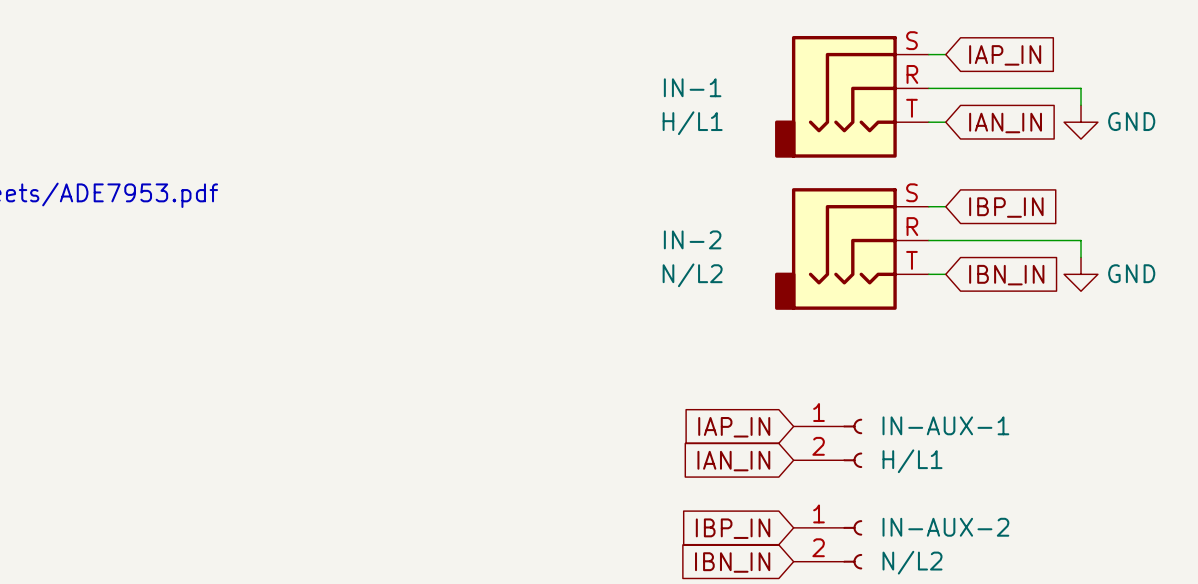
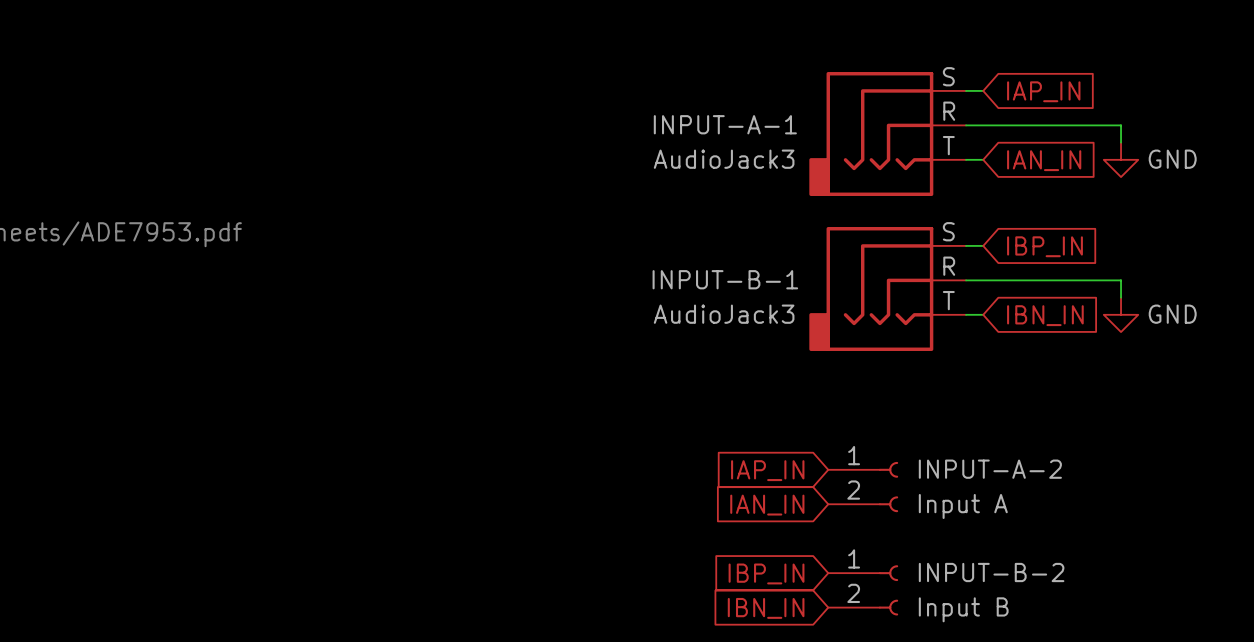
IN-1 name: IN-1 (692, 87) -> INPUT-A-1 (725, 124)
IN-1 value: H/L1 (692, 123) -> AudioJack3 (724, 159)
IN-2 name: IN-2 (692, 239) -> INPUT-B-1 (725, 279)
IN-2 value: N/L2 (692, 275) -> AudioJack3 (724, 314)
IN-AUX-1 name: IN-AUX-1 (945, 425) -> INPUT-A-2 (990, 469)
IN-AUX-1 value: H/L1 (912, 461) -> Input A (963, 506)
IN-AUX-2 name: IN-AUX-2 (945, 527) -> INPUT-B-2 (991, 572)
IN-AUX-2 value: N/L2 (912, 562) -> Input B (963, 609)

